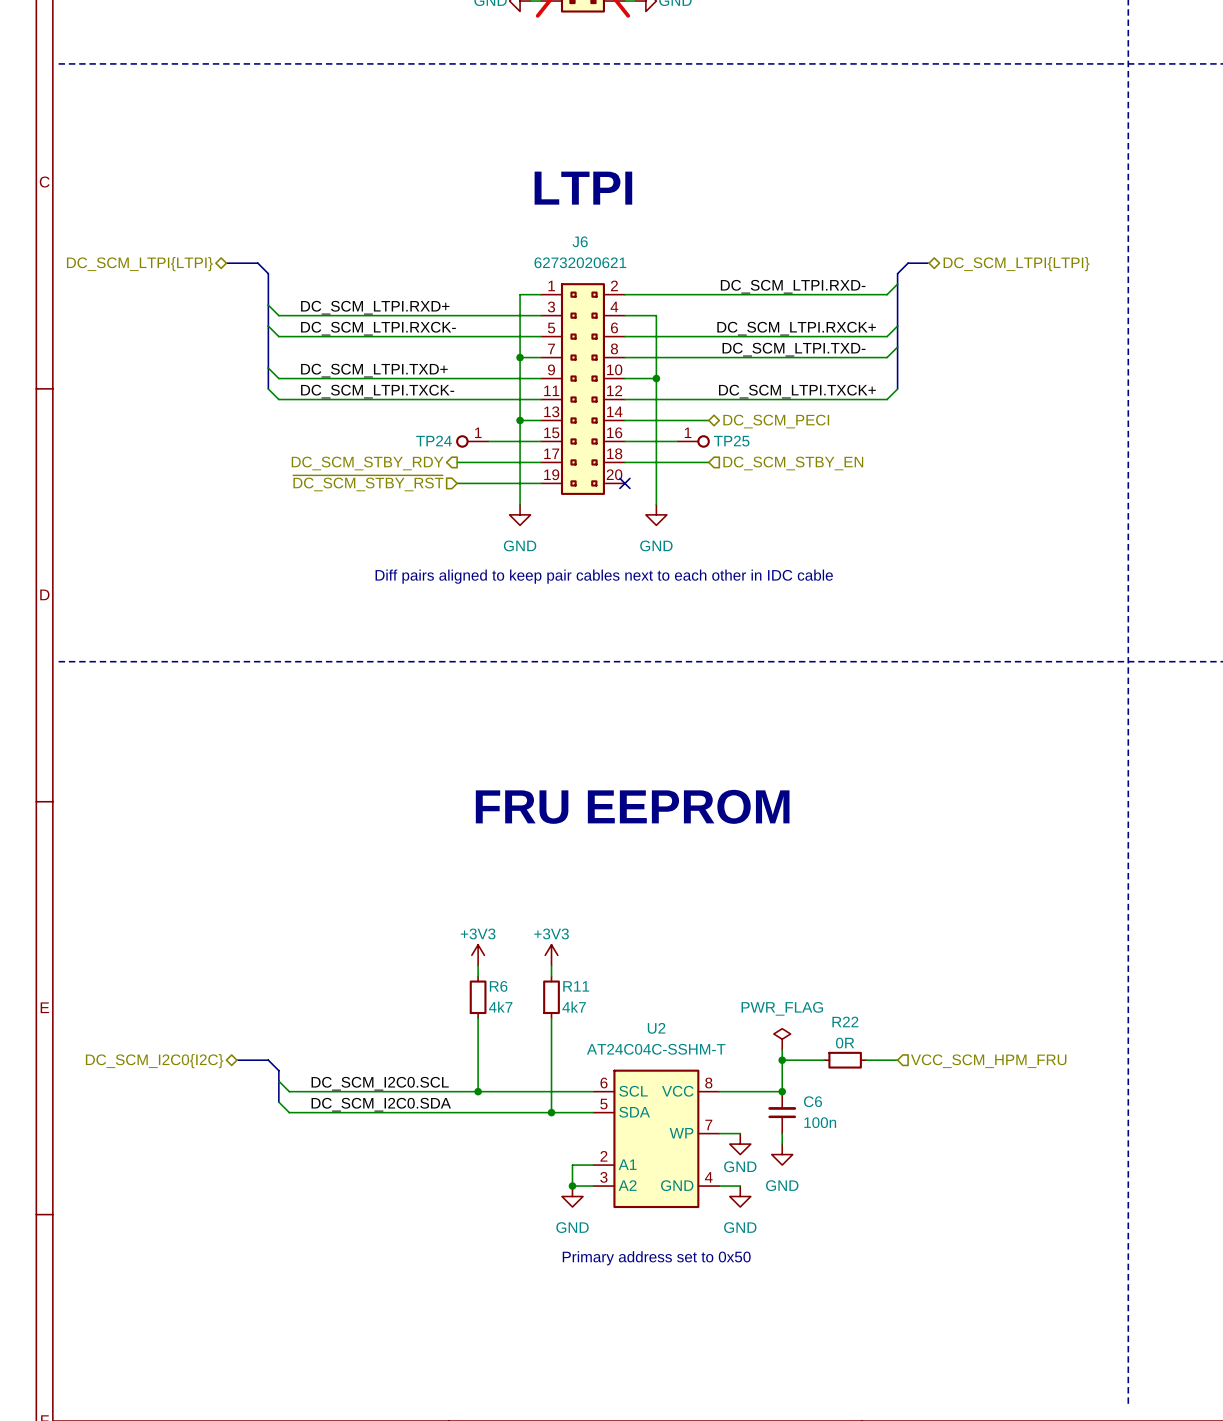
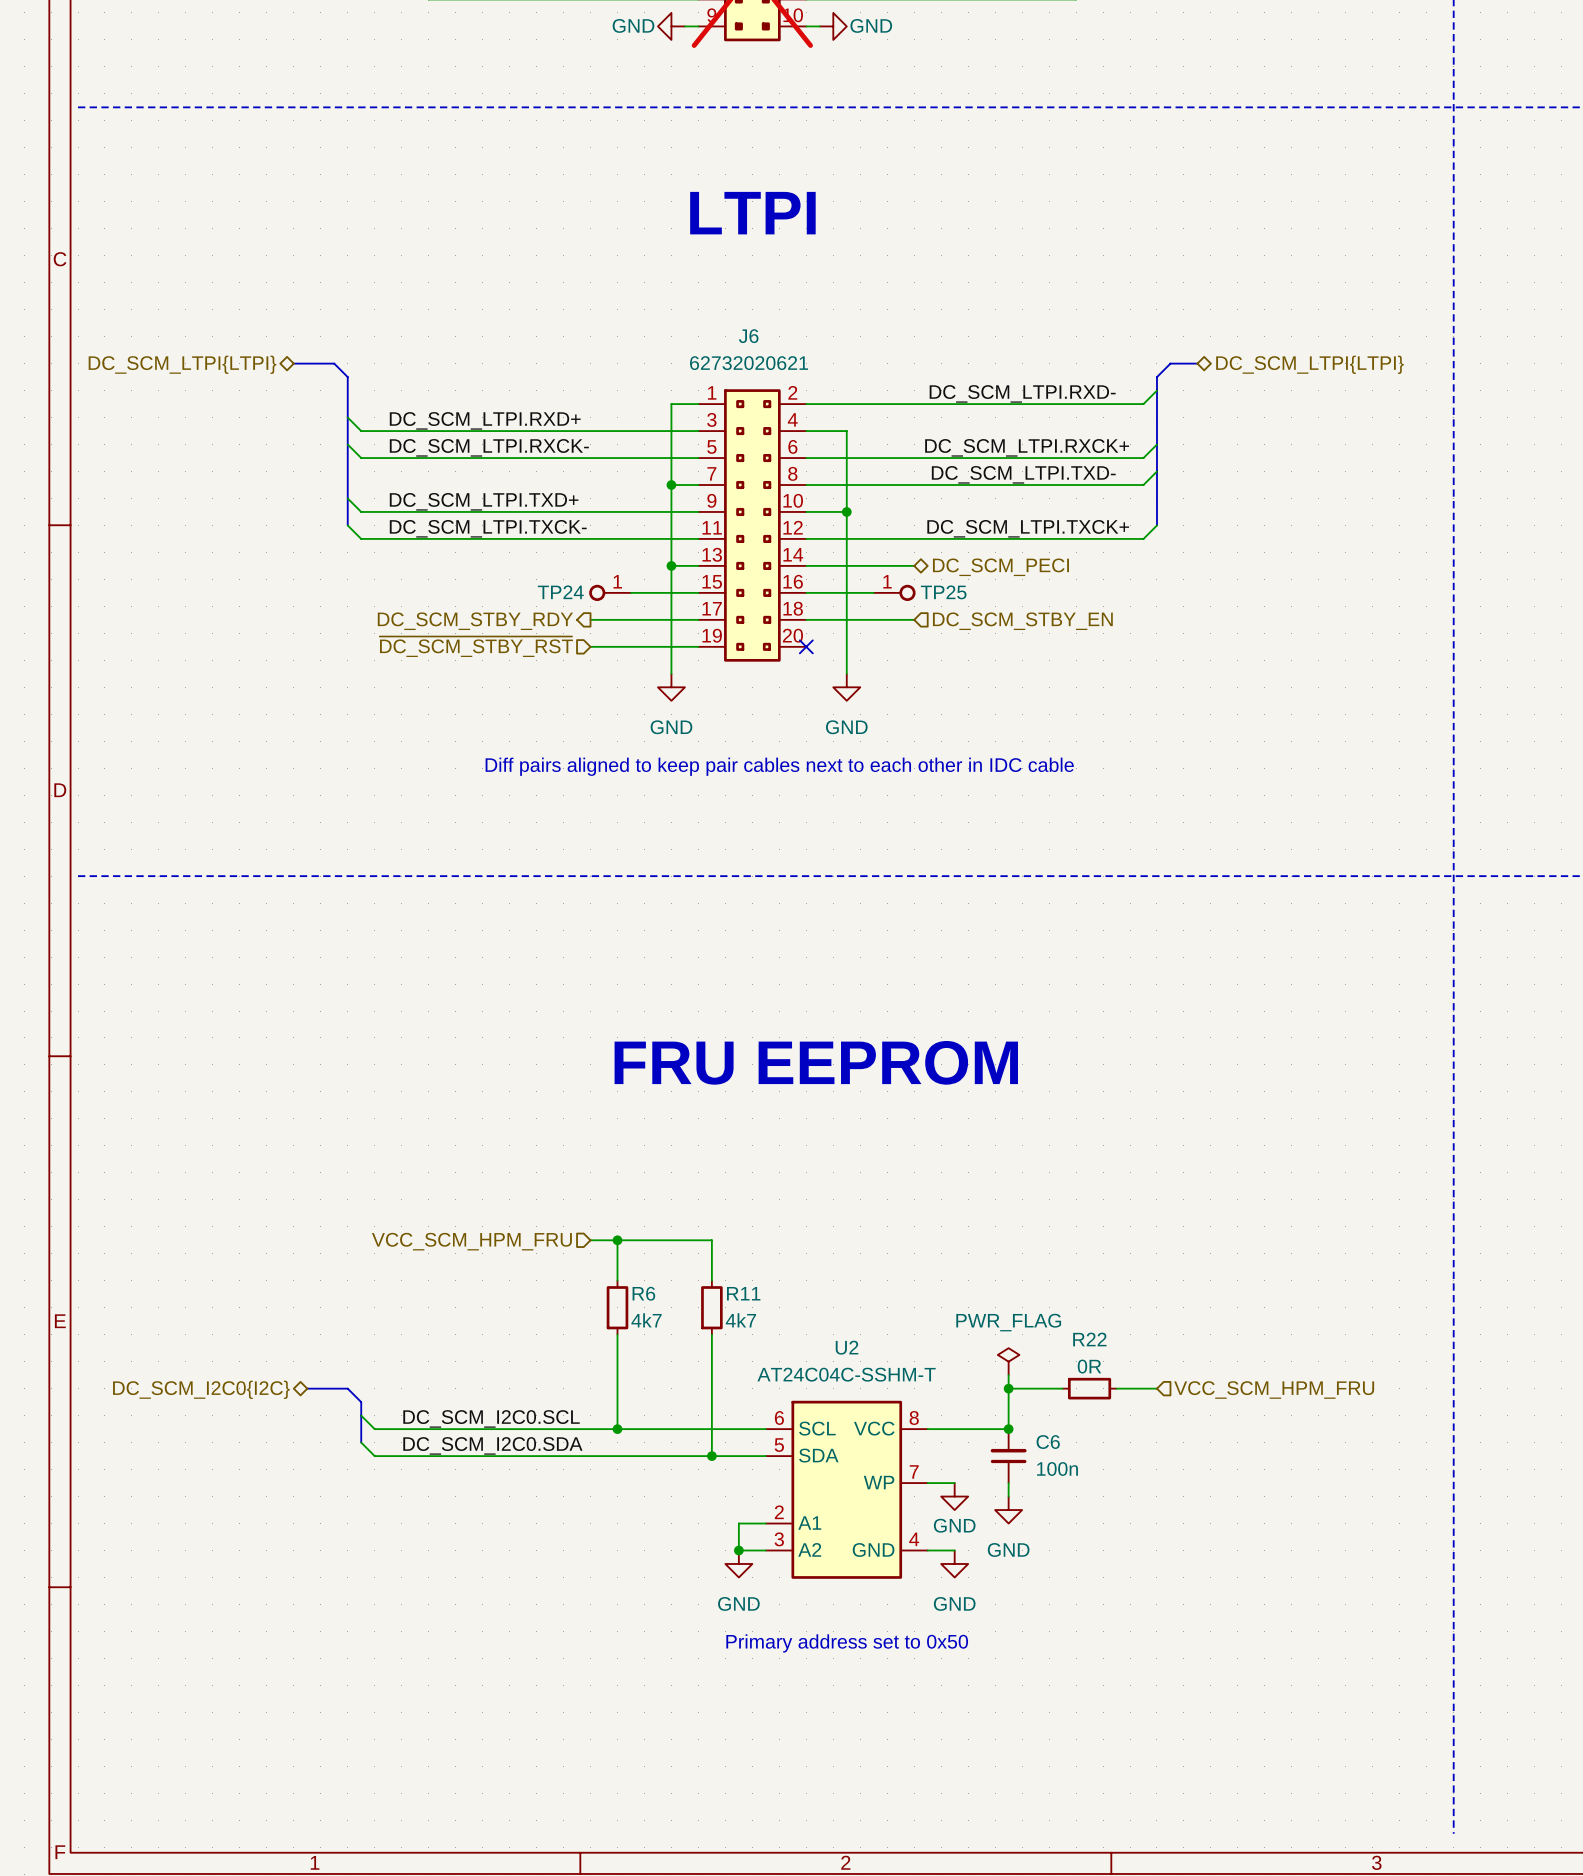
text position: LTPI (583, 188) -> LTPI (752, 213)
wire: none -> (590, 1240) (711, 1240) (711, 1267)
junction: none -> (617, 1240)
hierarchical label: none -> VCC_SCM_HPM_FRU (471, 1241)
power symbol: +3V3 (478, 955) -> none
power symbol: +3V3 (551, 955) -> none

